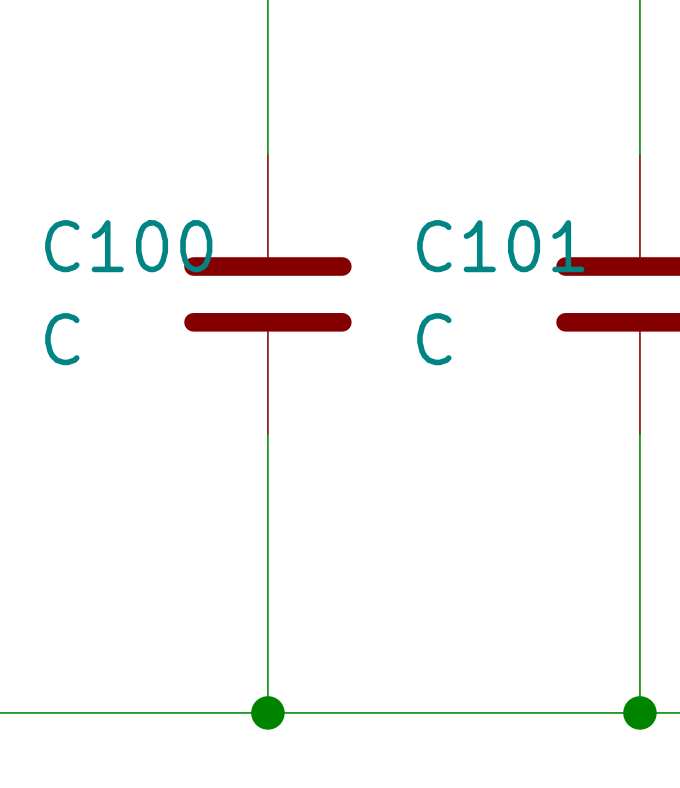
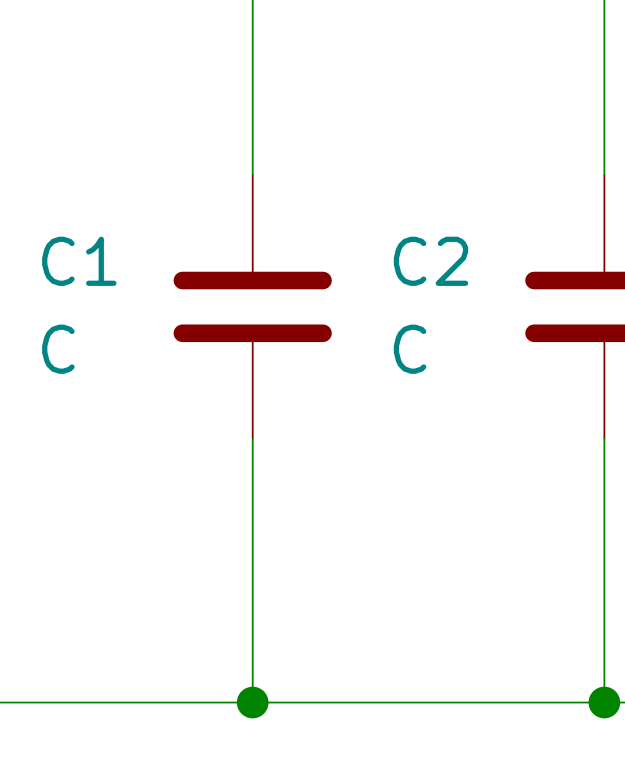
C100 name: C100 (128, 246) -> C1 (79, 261)
C101 name: C101 (500, 246) -> C2 (430, 261)

